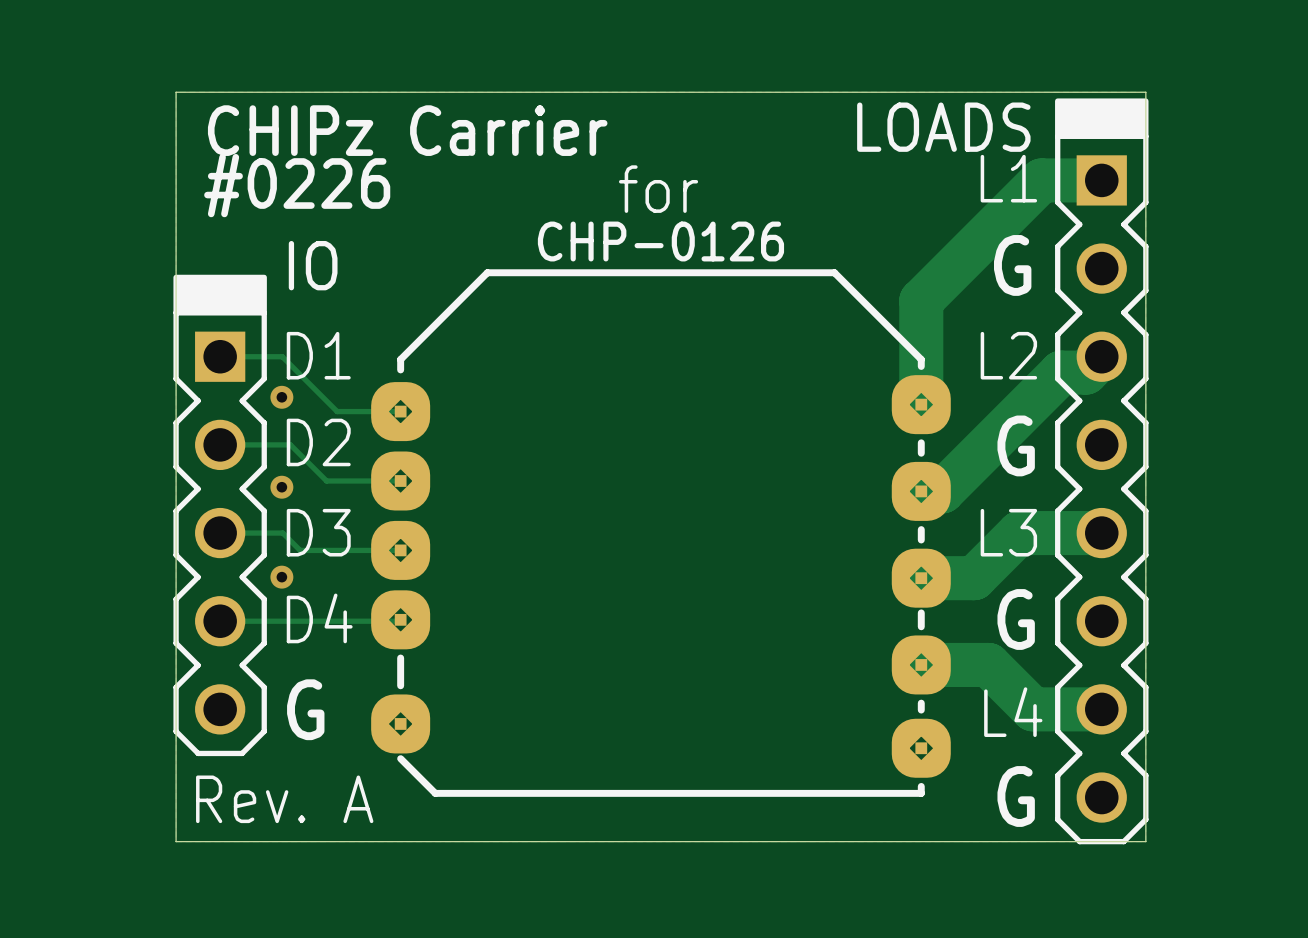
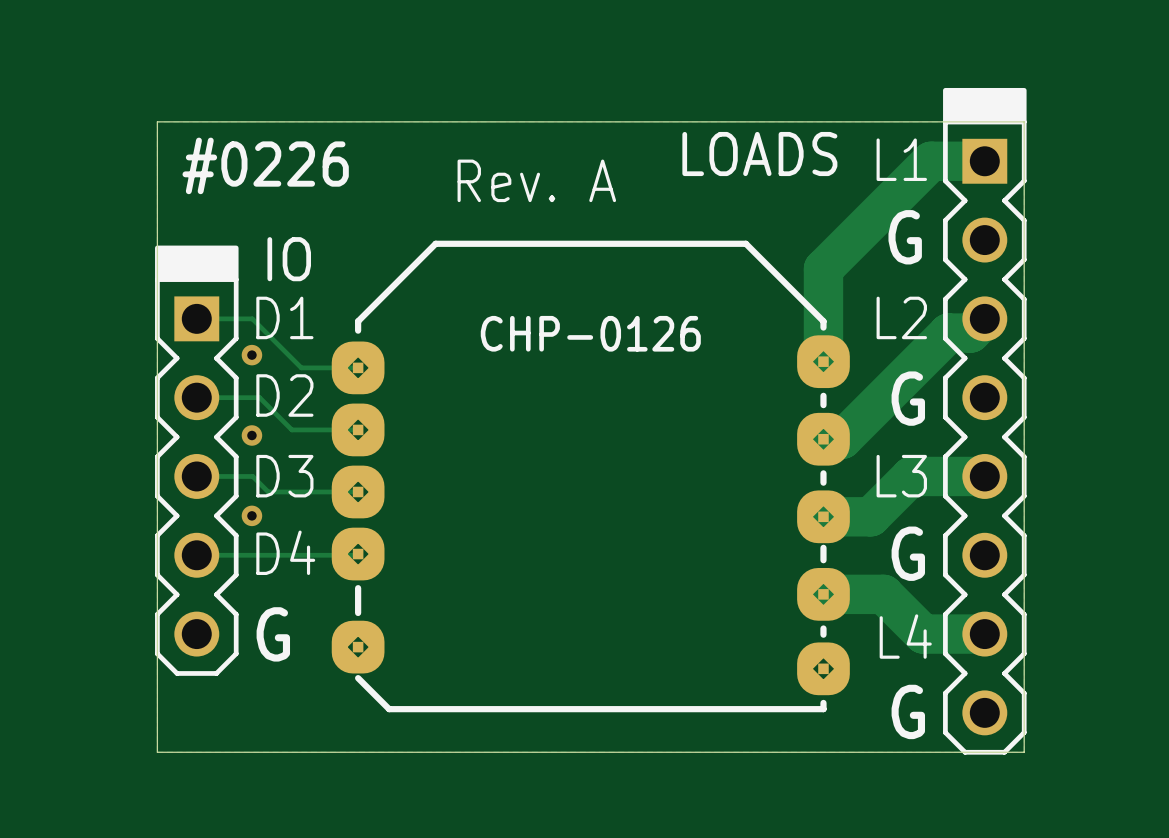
LOADS name position: LOADS (943, 127) -> LOADS (759, 154)
text: CHIPz Carrier (407, 130) -> none
board edge: (176, 136) (176, 92) (1145, 92) (1145, 136) -> (157, 121) (1024, 121)
text: for (658, 189) -> none
CHP-0126 name position: CHP-0126 (660, 241) -> CHP-0126 (590, 333)
IO name position: IO (313, 265) -> IO (289, 259)
text position: Rev. A (284, 799) -> Rev. A (536, 180)

